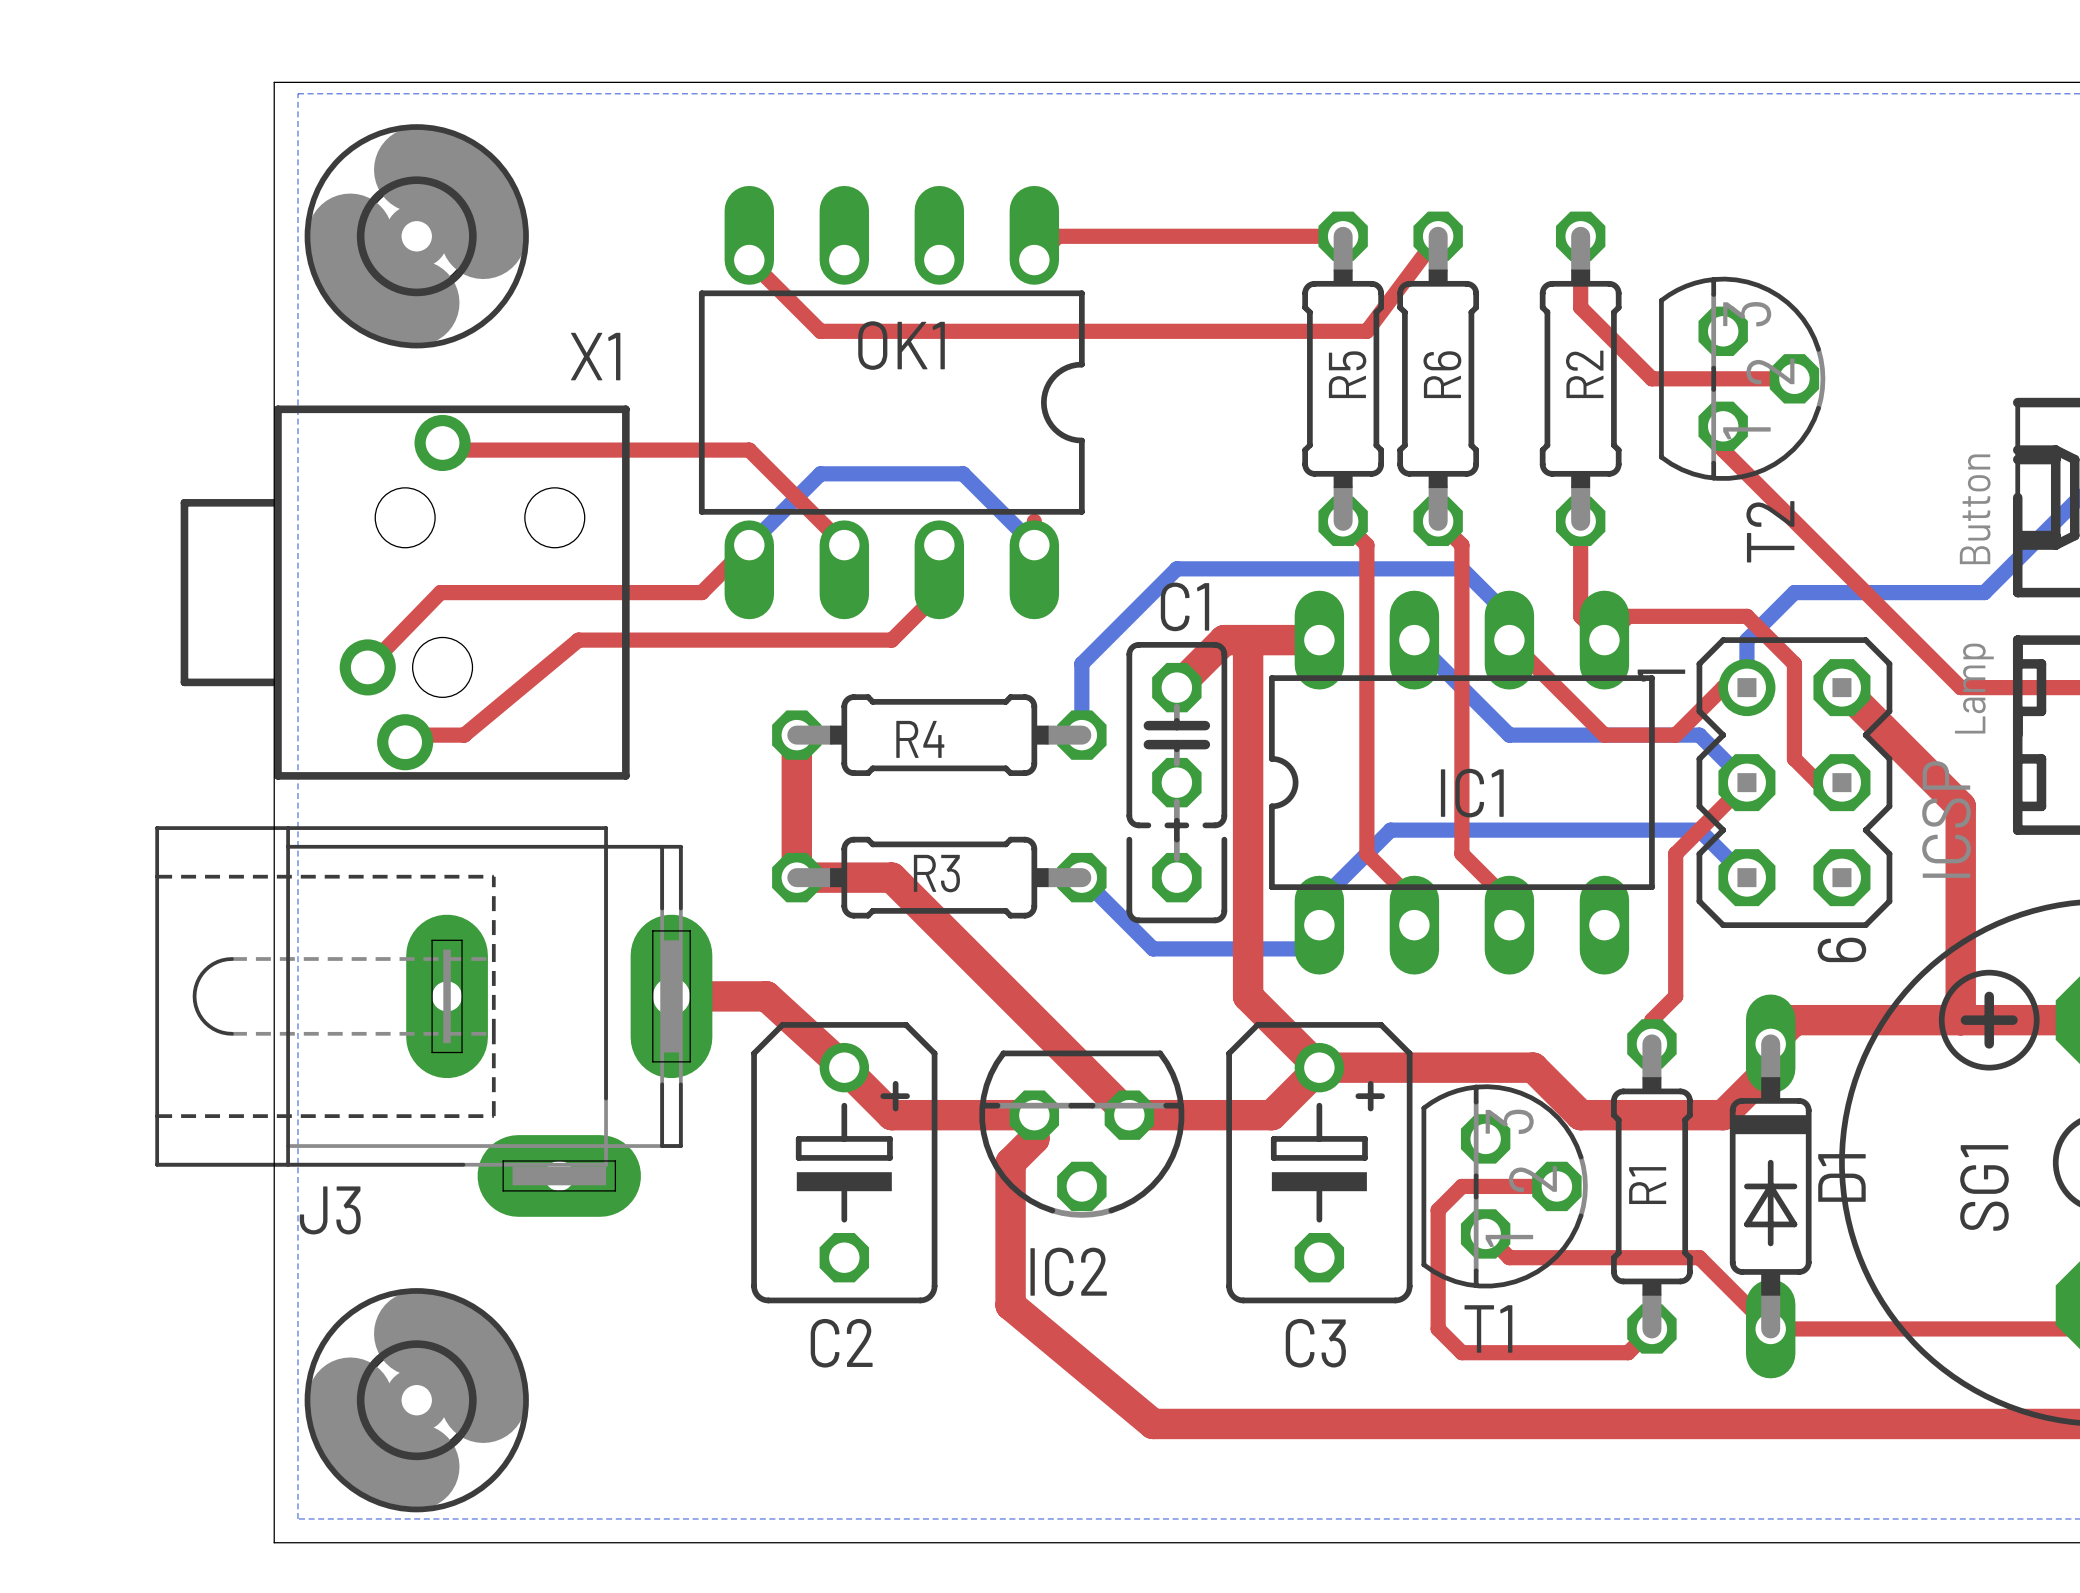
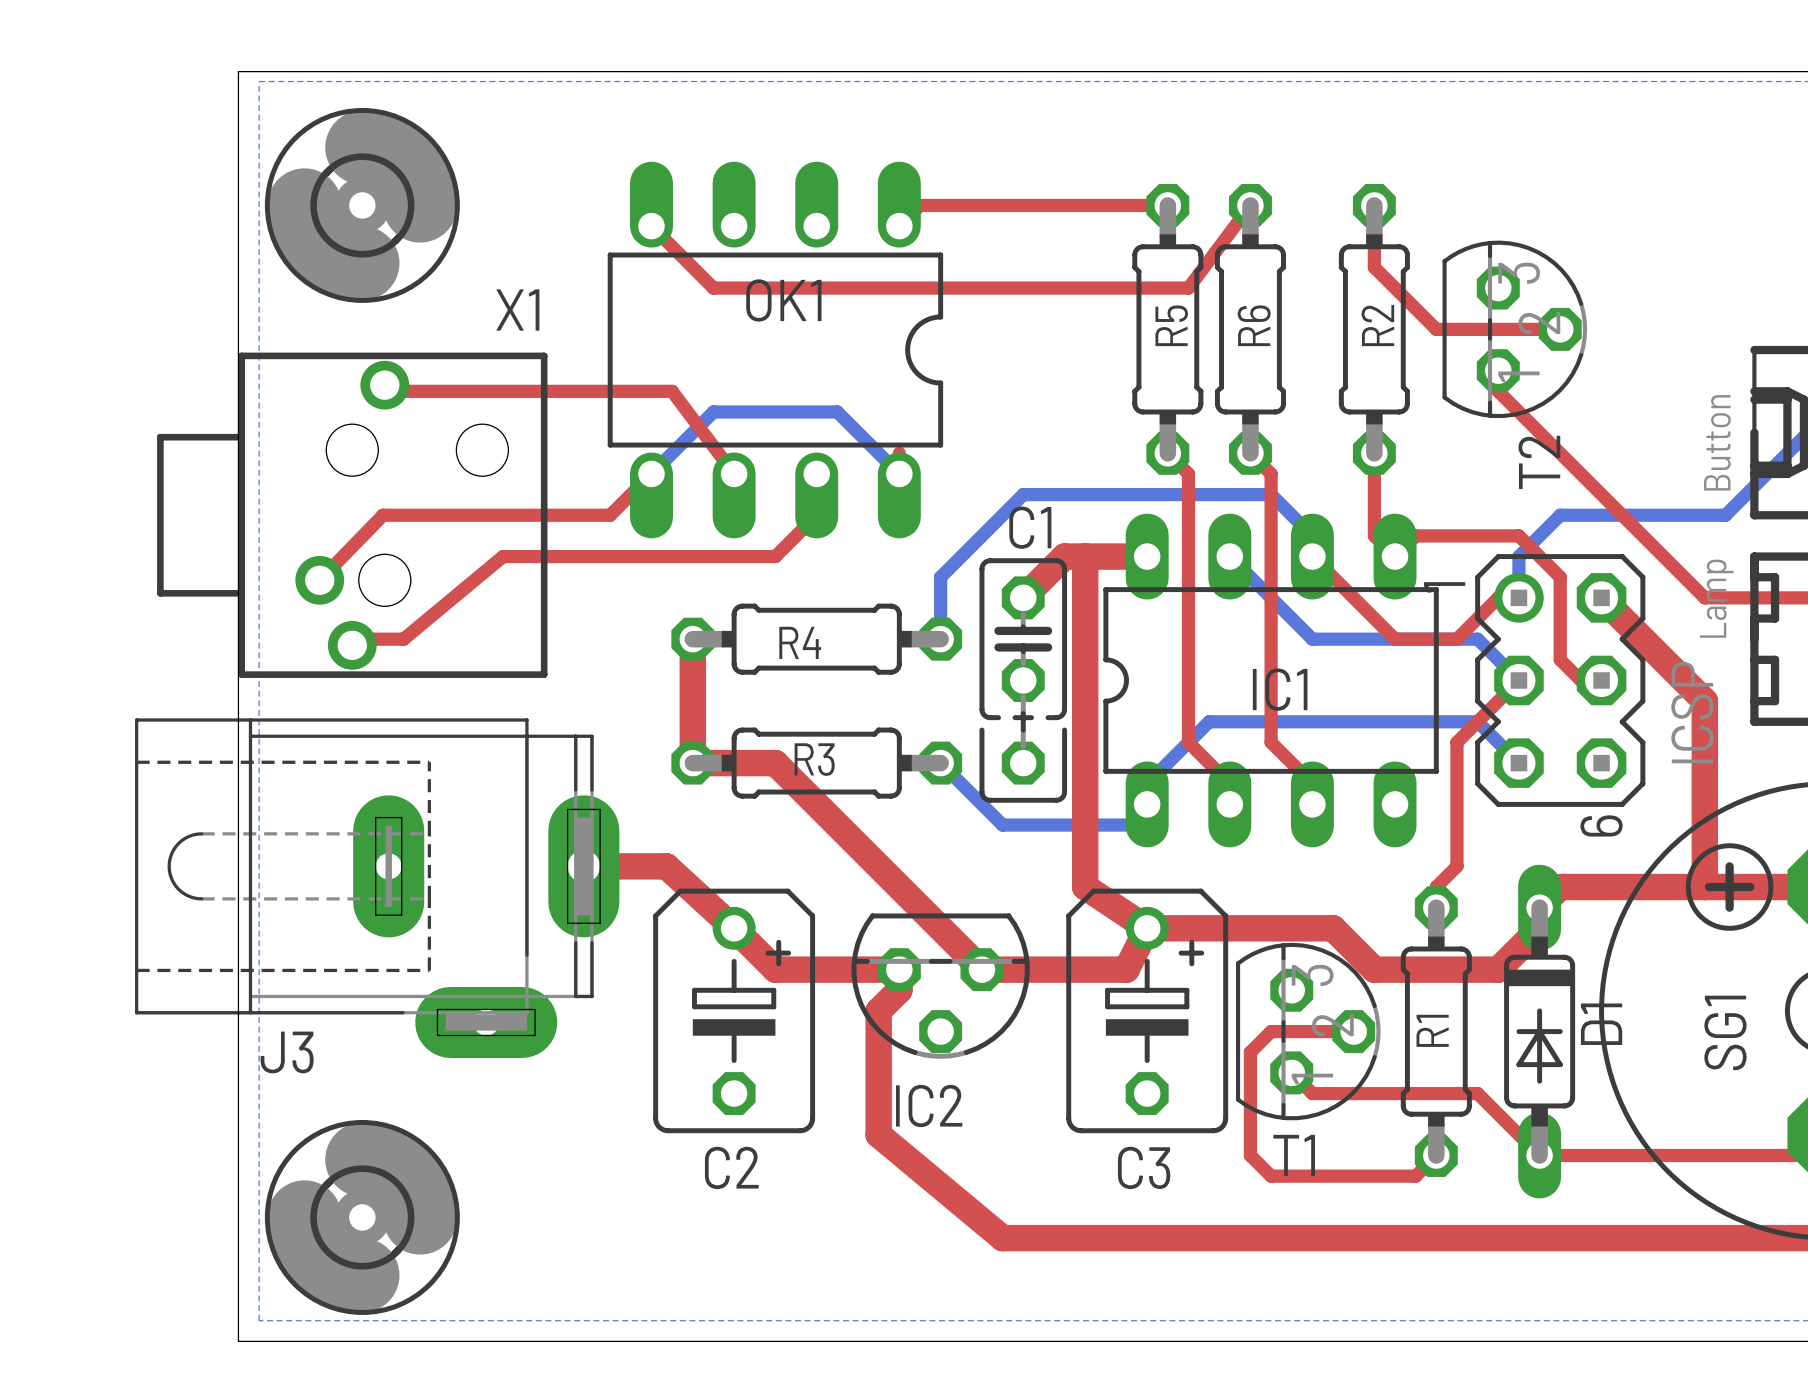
top track: (749, 450) (844, 545) -> (651, 391) (672, 391) (734, 473)
top track: (1248, 996) (1319, 1067) (1271, 1115) -> (1085, 866) (1085, 887) (1147, 928) (1126, 969) (1105, 969)

